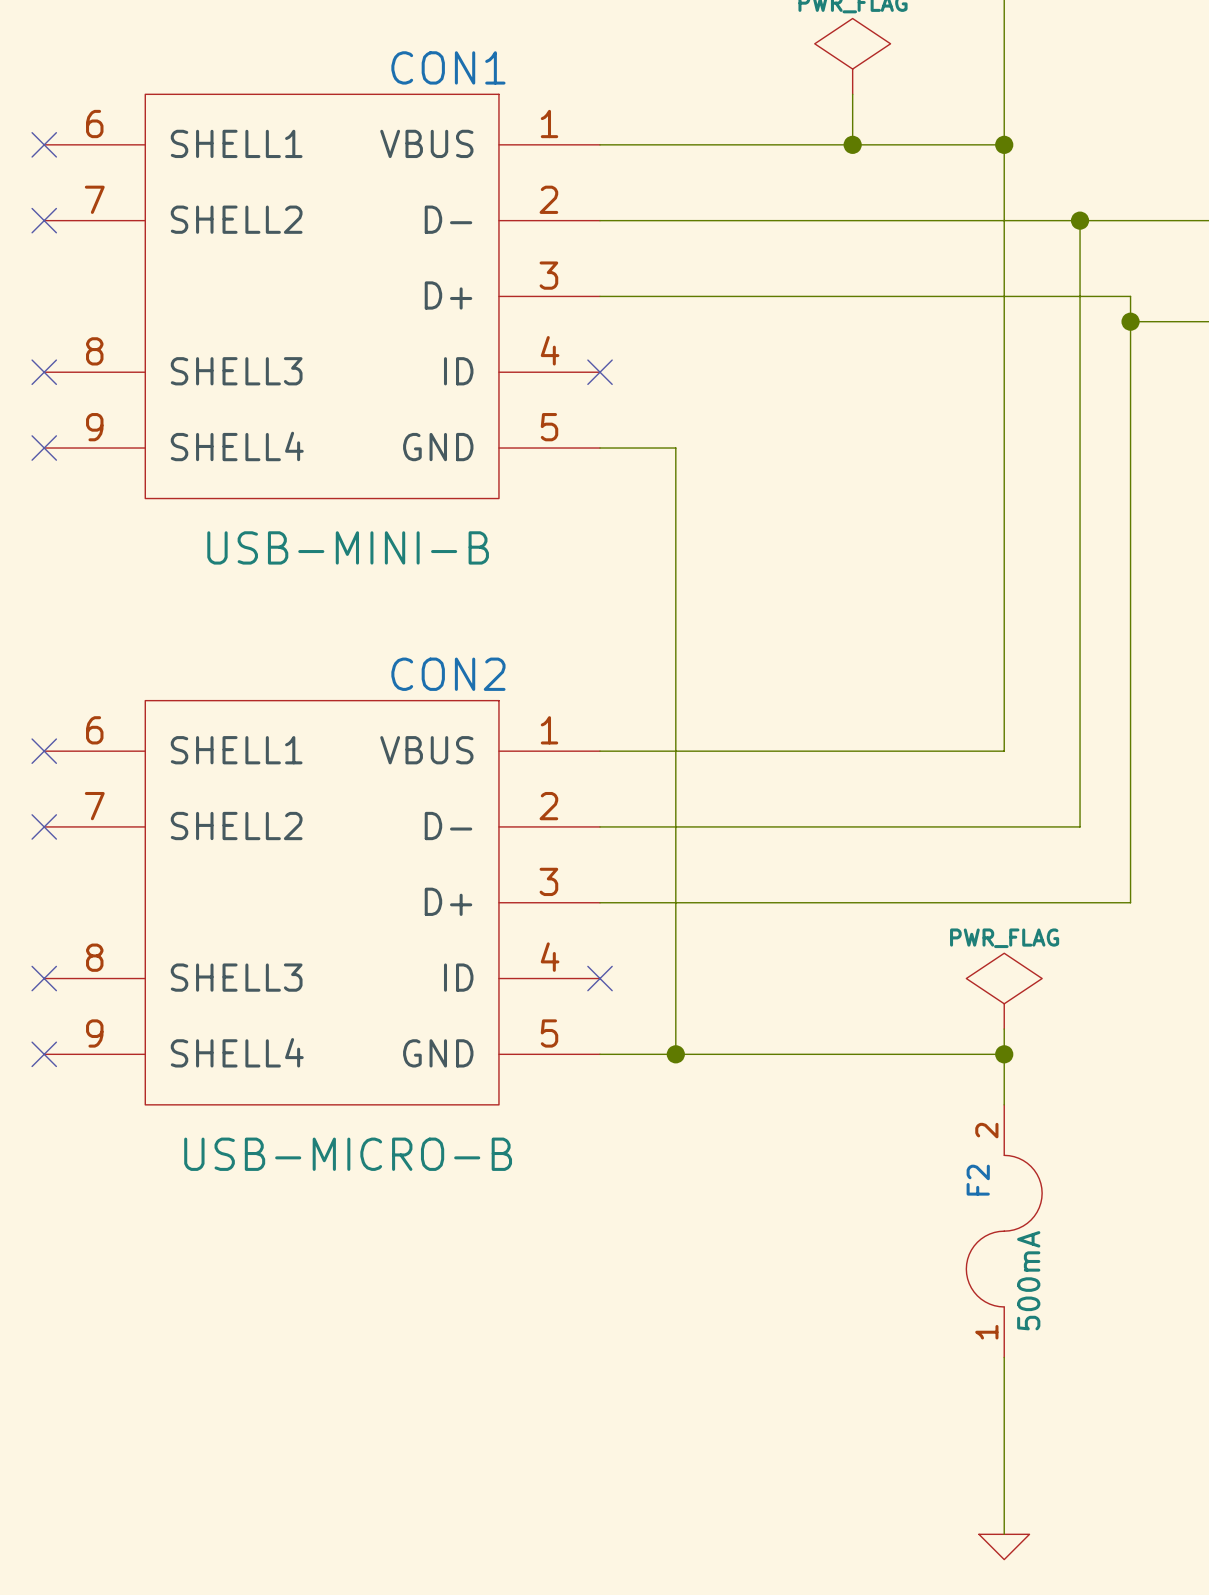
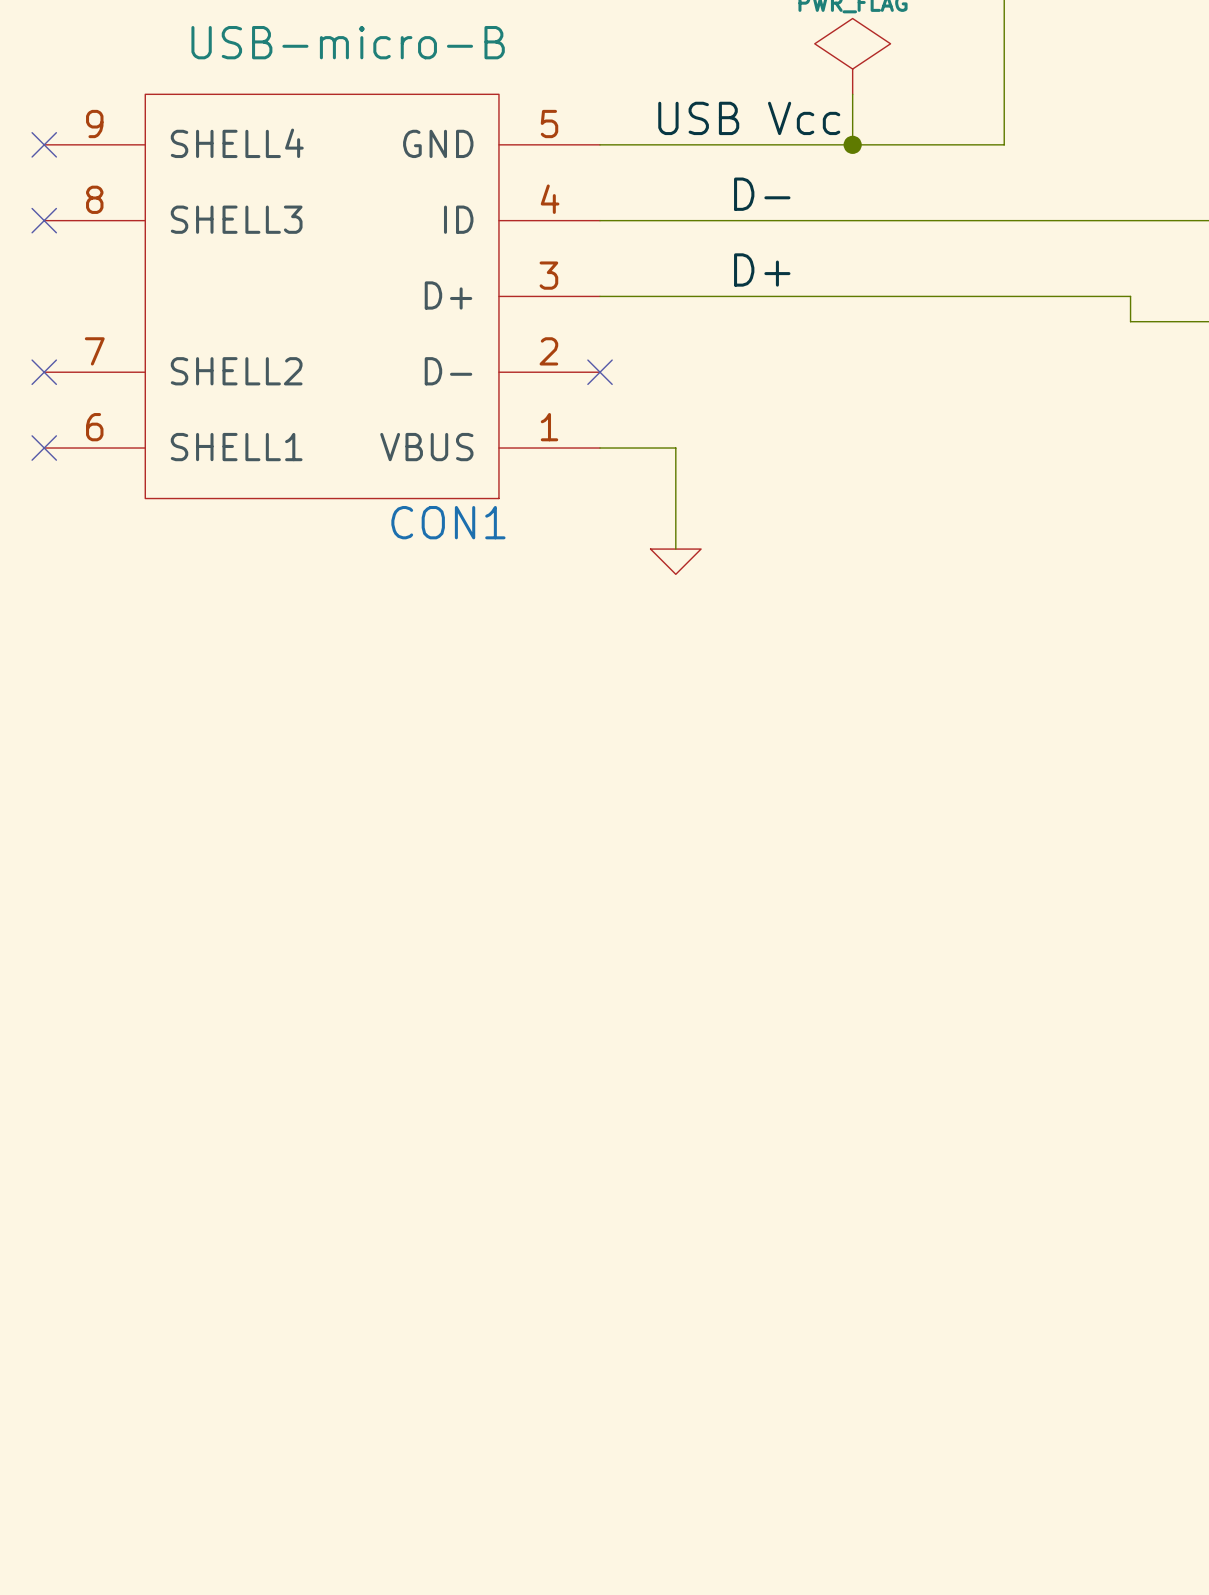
label: none -> USB Vcc (749, 118)
wire: (1004, 144) (1004, 751) (600, 751) -> none
junction: (1004, 144) -> none
label: none -> D- (762, 194)
wire: (1080, 220) (1080, 826) (600, 826) -> none
junction: (1080, 220) -> none
label: none -> D+ (762, 269)
CON1 flip: as is (322, 296) -> up-down (322, 296)
wire: (1130, 321) (1130, 902) (600, 902) -> none
junction: (1130, 321) -> none
CON1 value: USB-MINI-B (348, 547) -> USB-micro-B (348, 42)
wire: (675, 549) (675, 1054) -> none
power symbol: none -> (675, 561)
no-connect mark: (44, 751) -> none
no-connect mark: (44, 826) -> none
CON2: USB-MICRO-B (322, 902) -> none
no-connect mark: (44, 978) -> none
no-connect mark: (600, 978) -> none
power symbol: PWR_FLAG (1004, 991) -> none
wire: (1004, 1029) (1004, 1104) -> none
no-connect mark: (44, 1054) -> none
wire: (600, 1054) (1004, 1054) -> none
junction: (675, 1054) -> none
junction: (1004, 1054) -> none
F2: 500mA (1004, 1231) -> none
wire: (1004, 1357) (1004, 1534) -> none
power symbol: (1004, 1546) -> none

